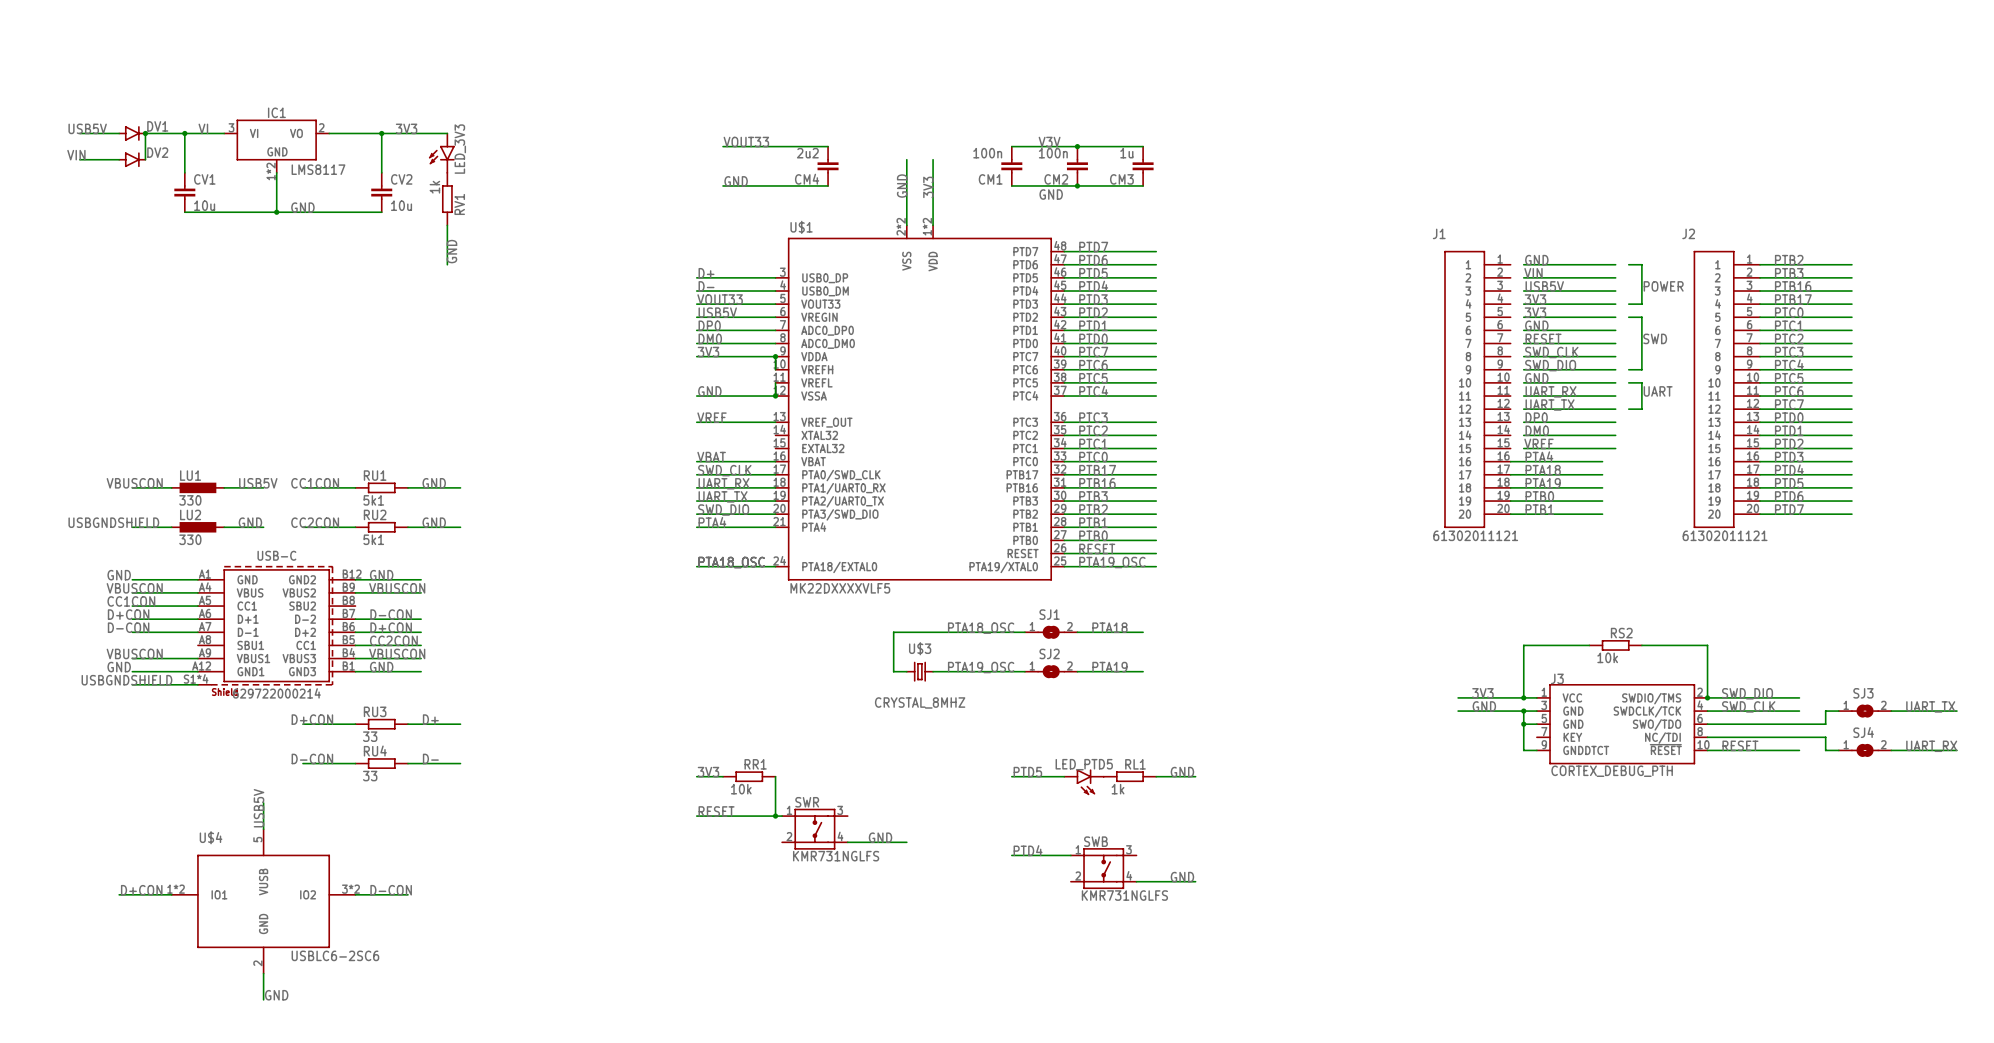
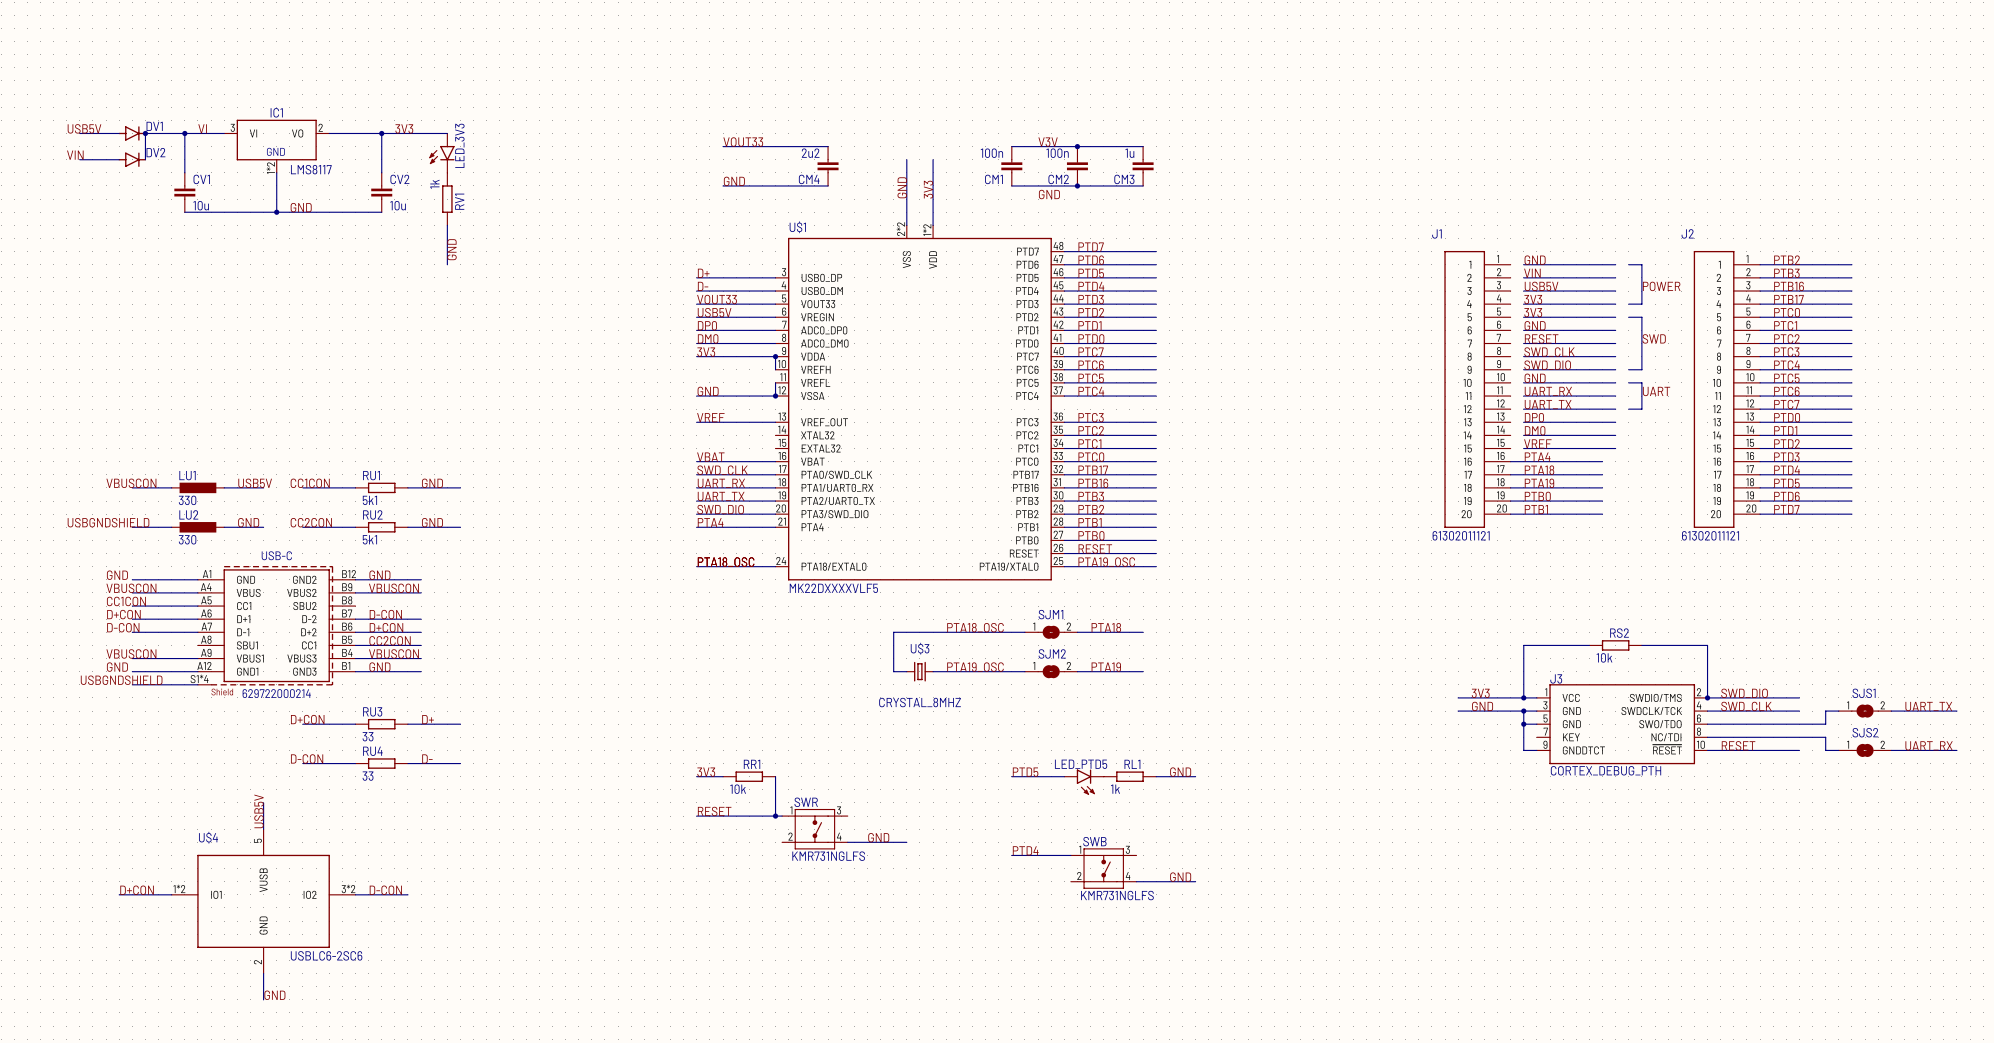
SJ1 name: SJ1 (1049, 614) -> SJM1 (1050, 614)
SJ2 name: SJ2 (1049, 653) -> SJM2 (1052, 653)
SJ3 name: SJ3 (1863, 693) -> SJS1 (1864, 693)
SJ4 name: SJ4 (1863, 732) -> SJS2 (1865, 732)

